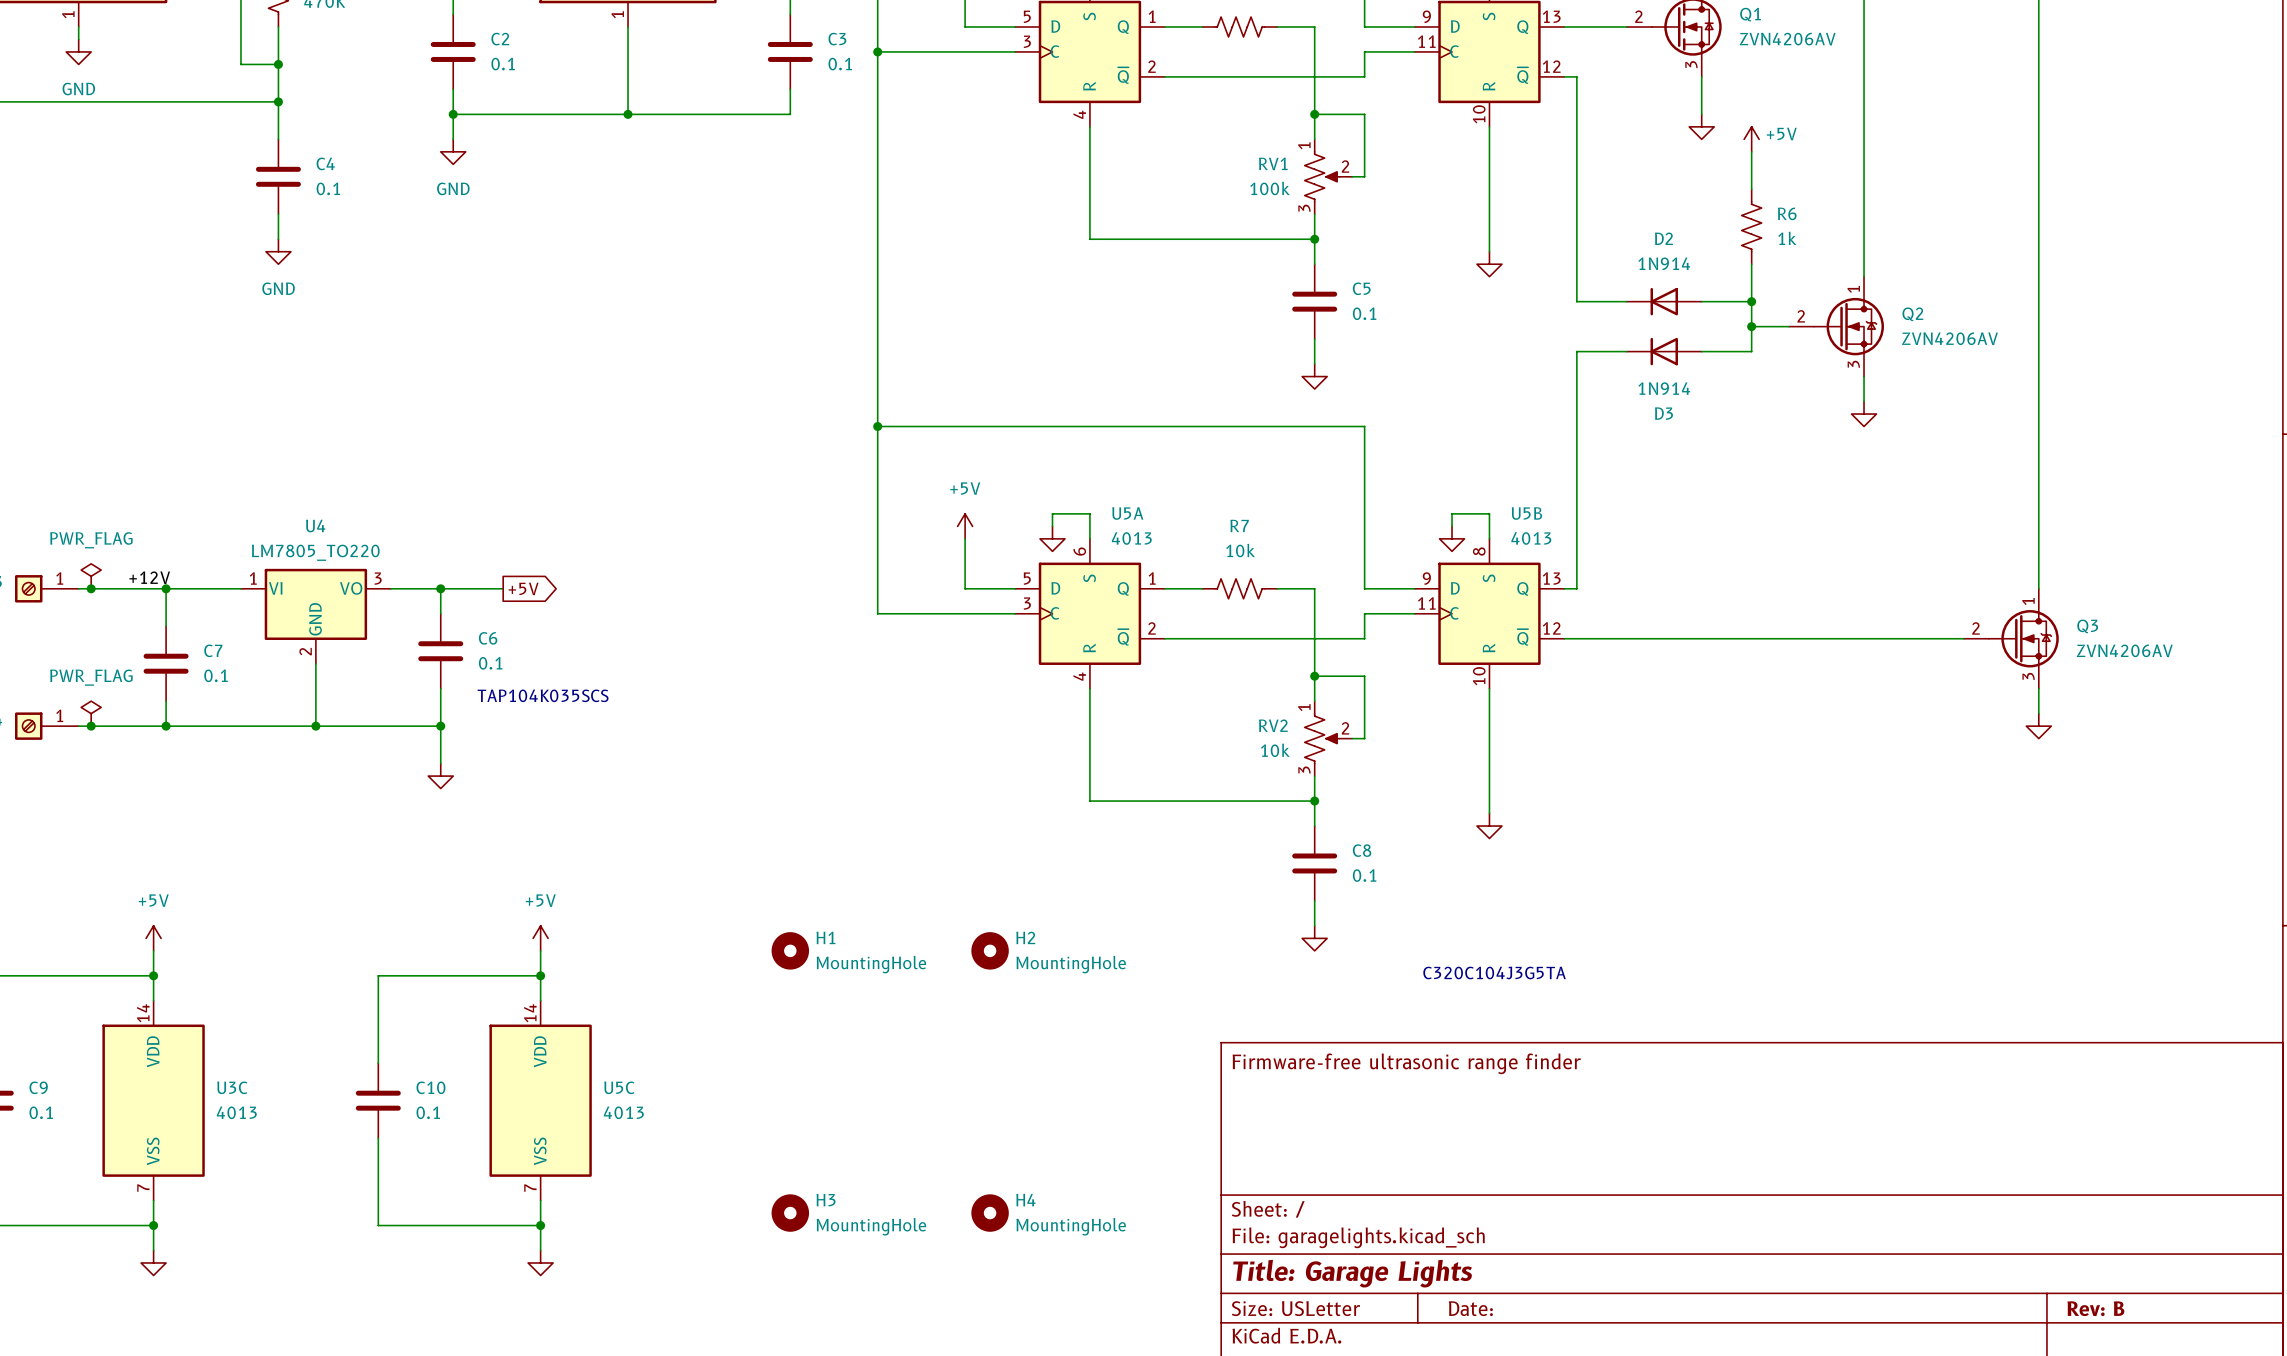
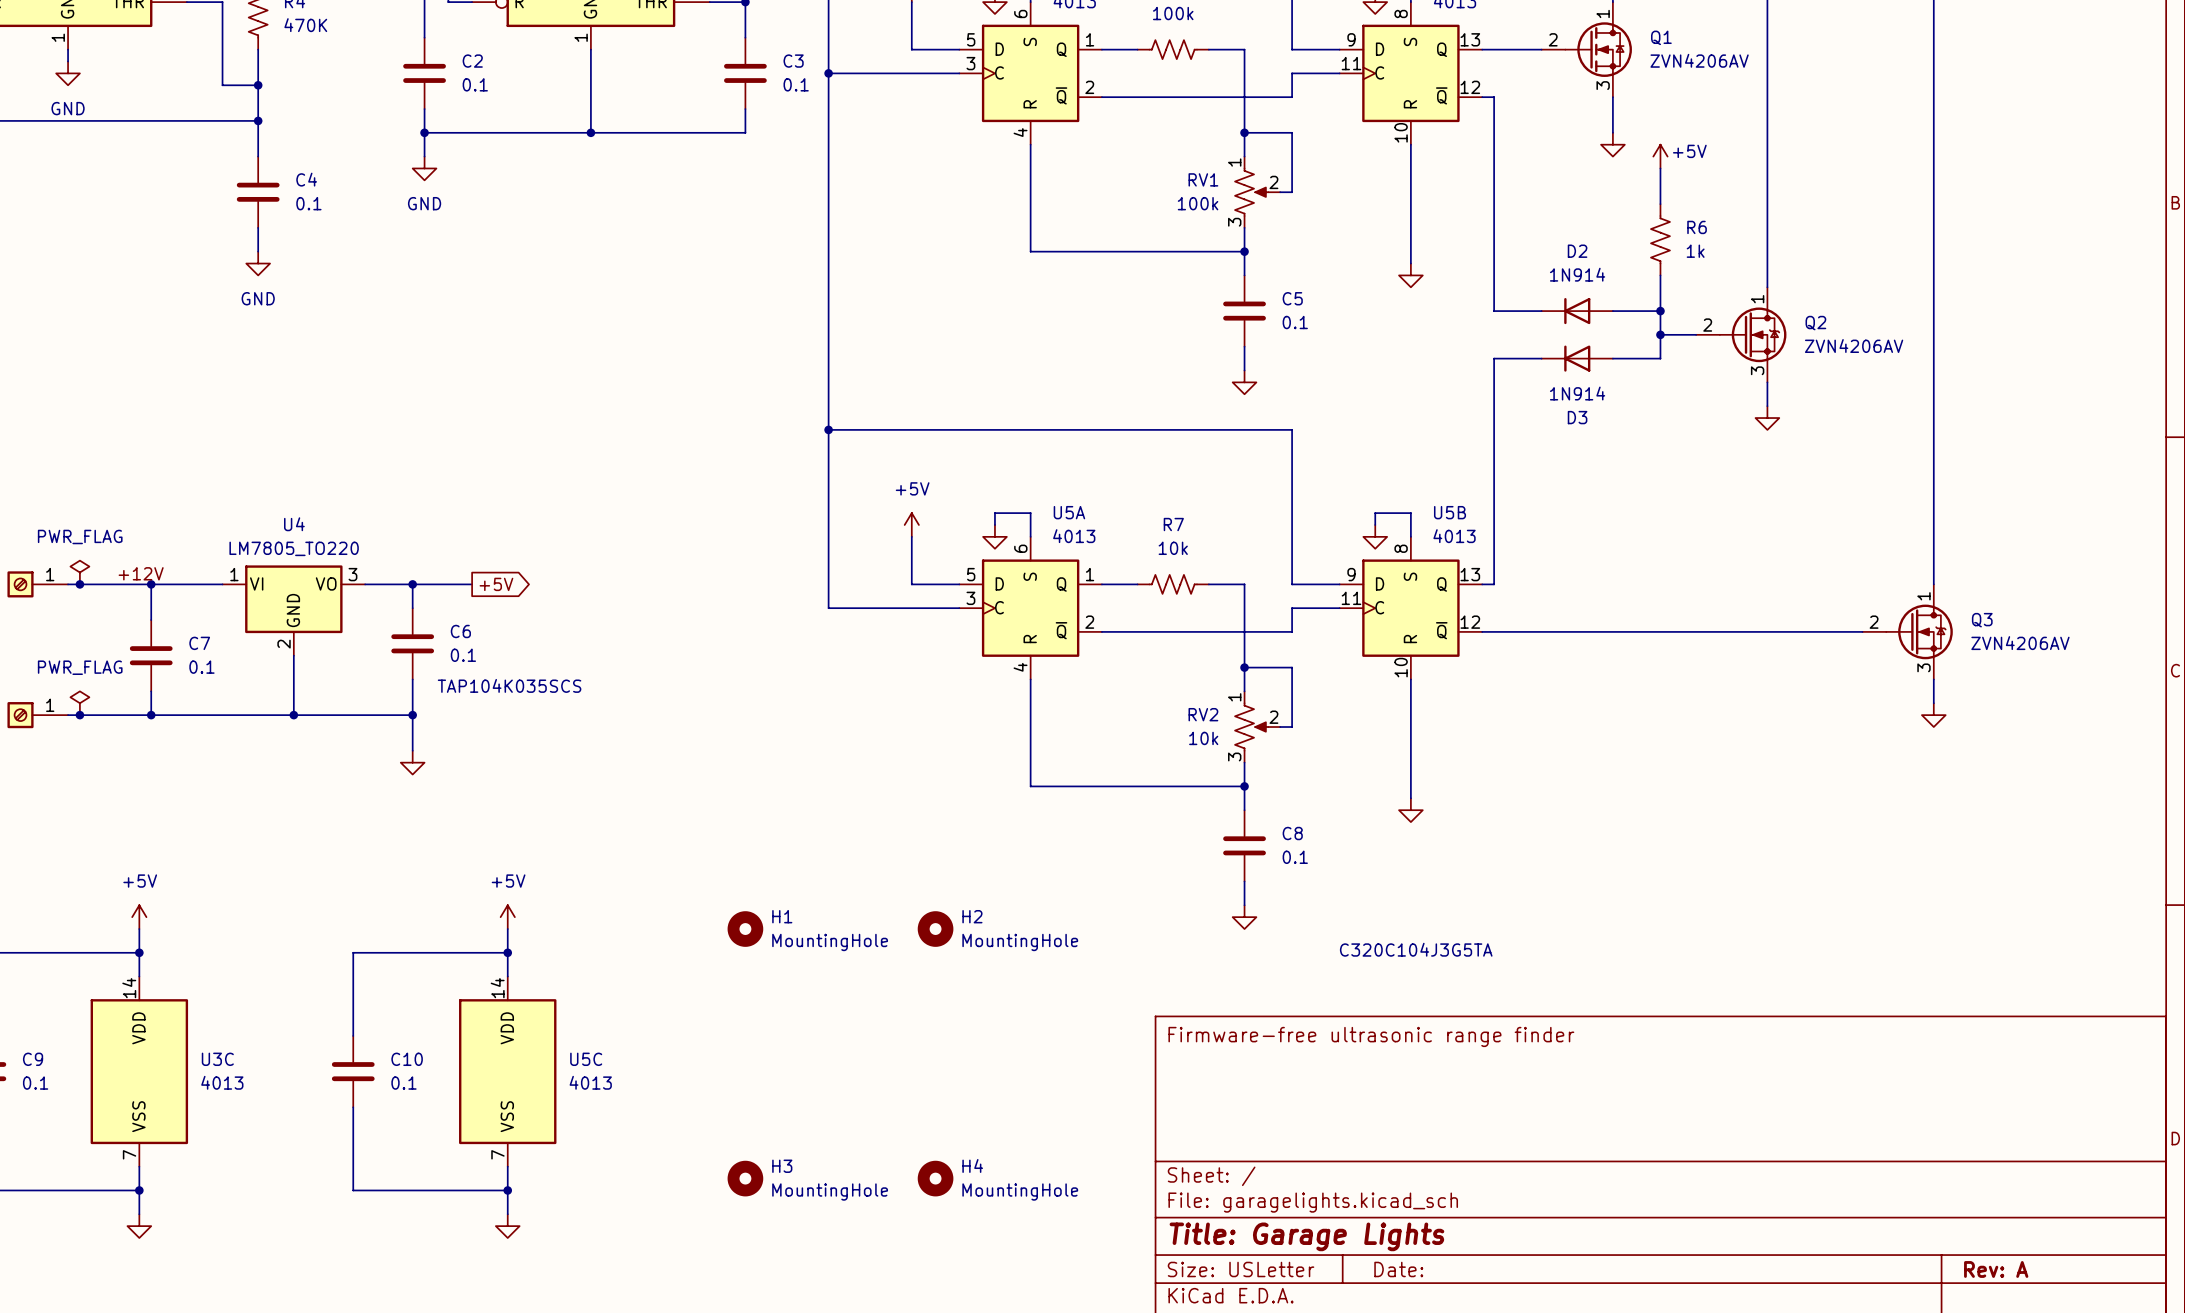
title block: Rev: B (2095, 1308) -> Rev: A (1996, 1269)

